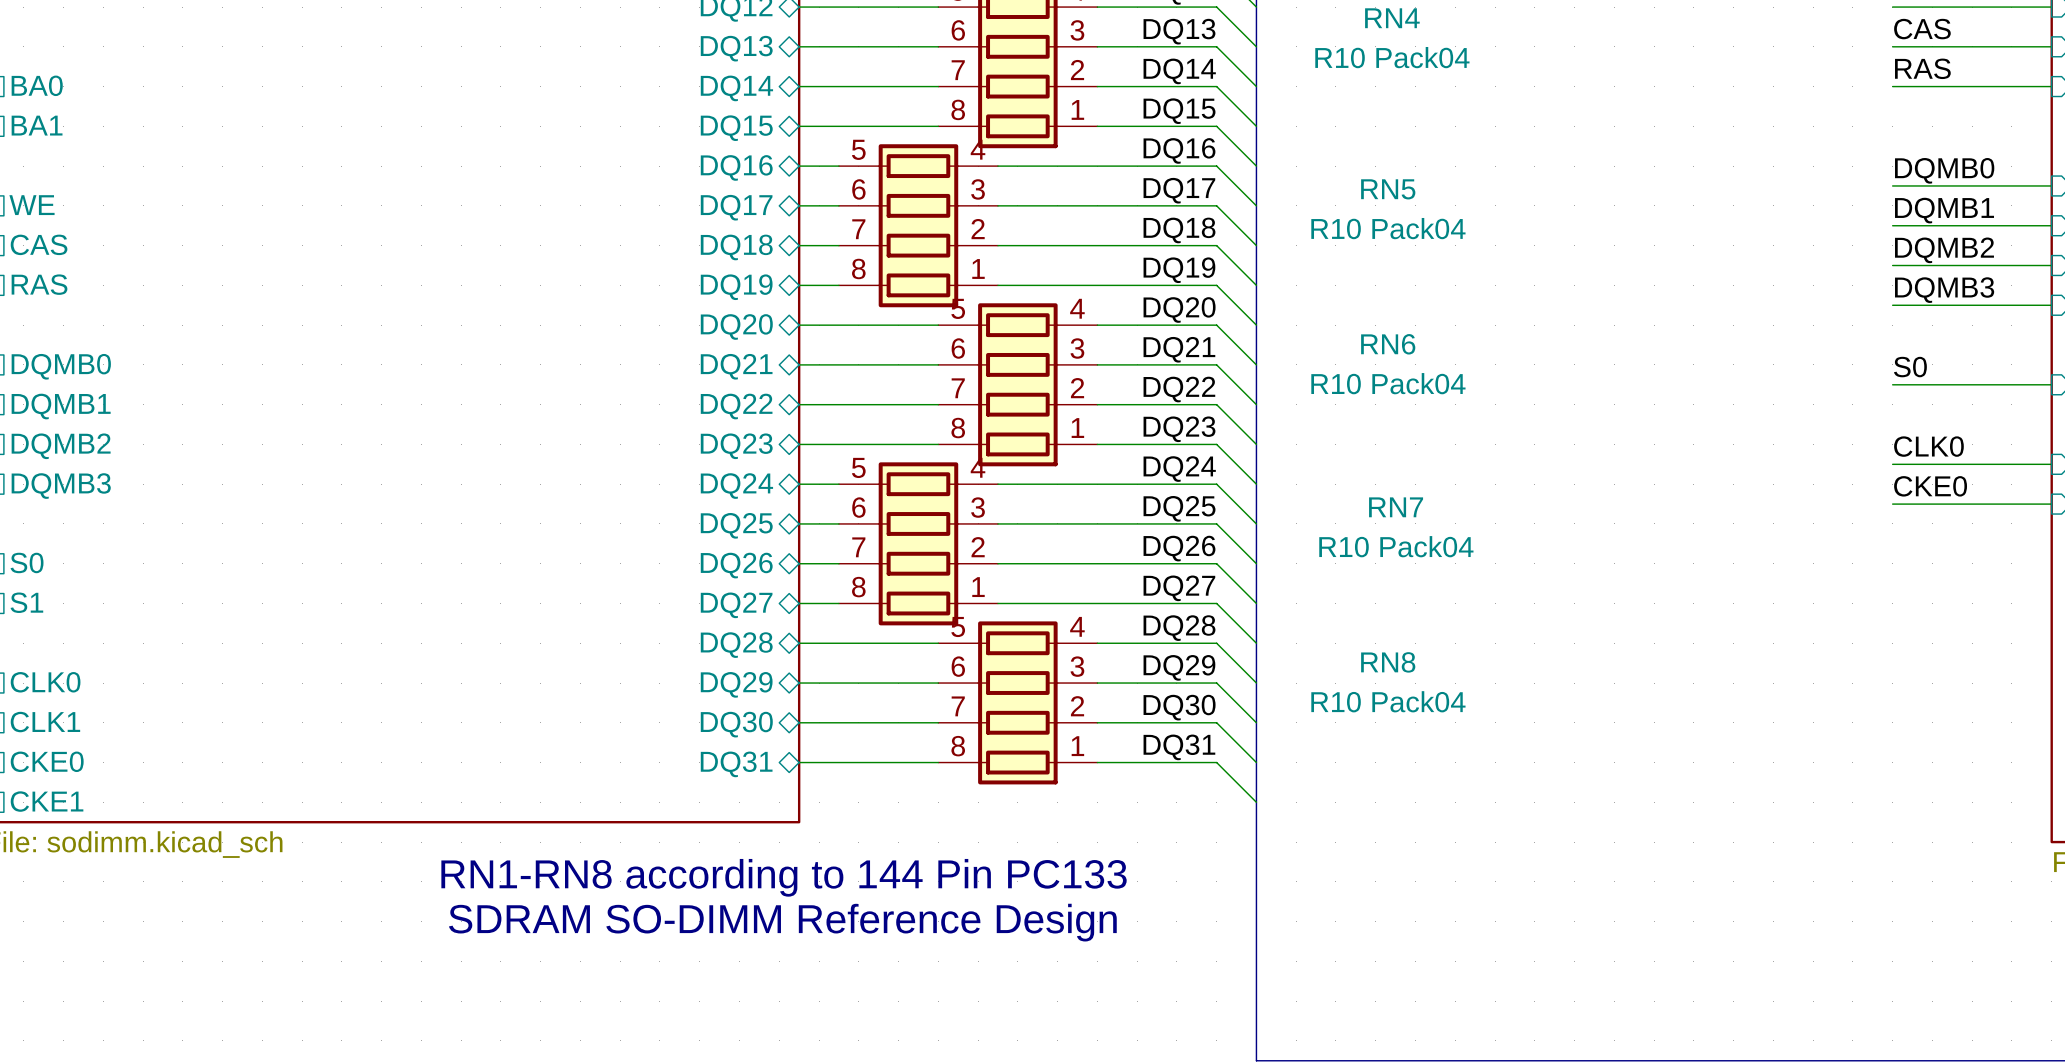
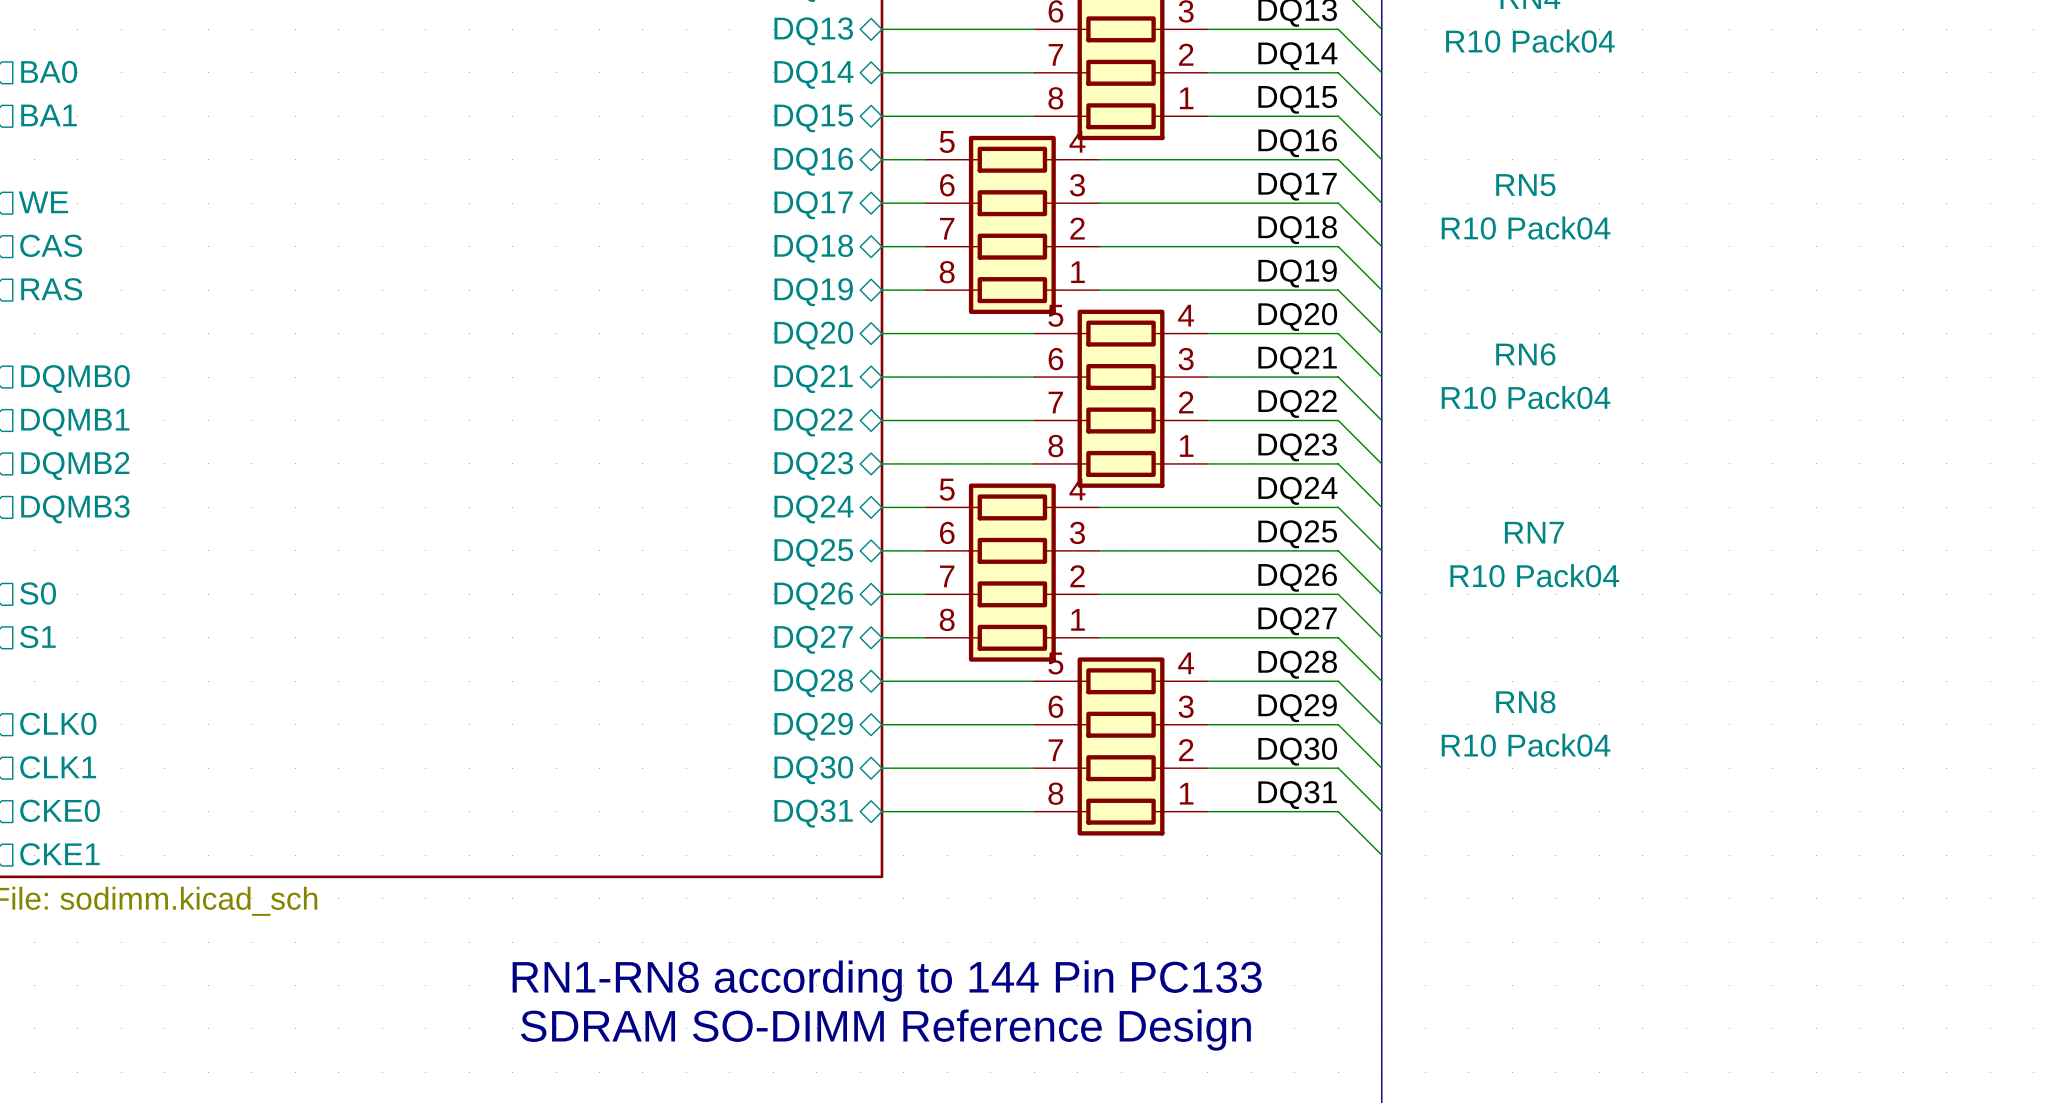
text position: RN1-RN8 according to 144 Pin PC133 (784, 877) -> RN1-RN8 according to 144 Pin PC133 (887, 981)
text position: SDRAM SO-DIMM Reference Design (782, 922) -> SDRAM SO-DIMM Reference Design (885, 1030)

